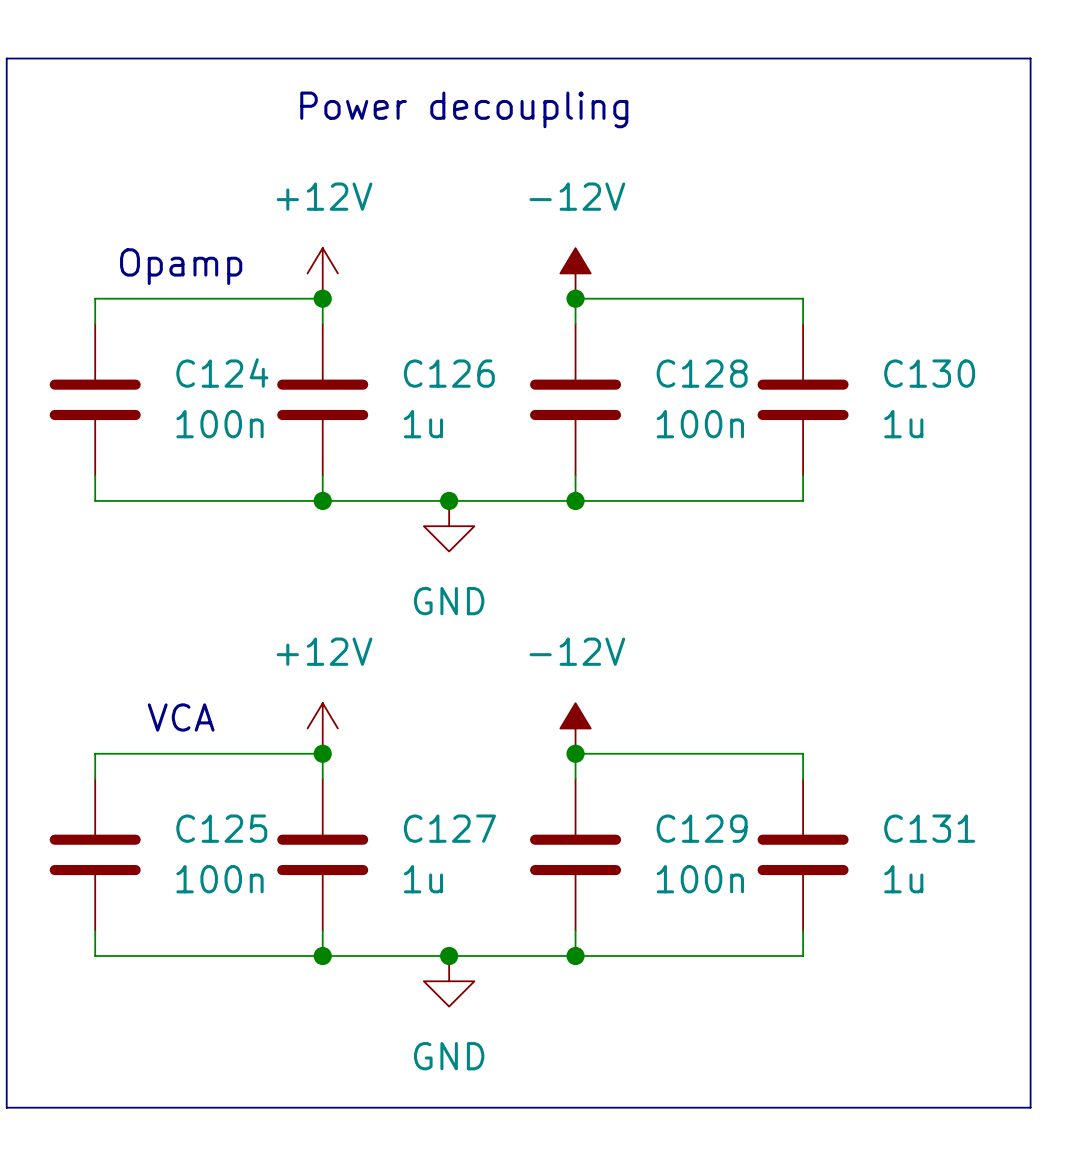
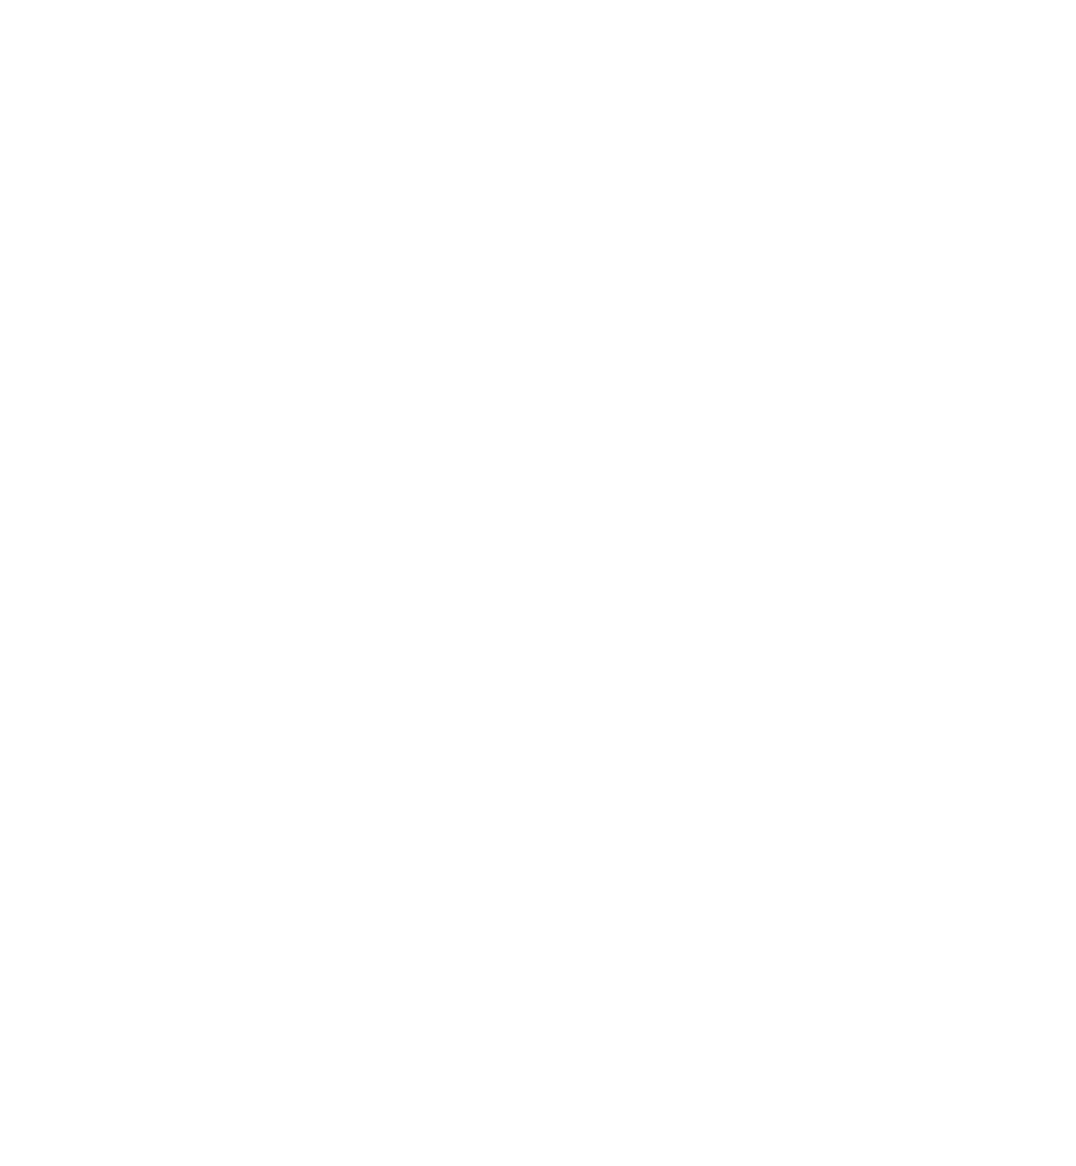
line: (6, 58) (1030, 58) (1030, 1107) (6, 1107) (6, 58) -> none
text: Power decoupling (464, 109) -> none
text: Opamp (181, 266) -> none
power symbol: +12V (322, 273) -> none
power symbol: -12V (575, 273) -> none
junction: (322, 298) -> none
junction: (575, 298) -> none
wire: (95, 323) (95, 298) (322, 298) (322, 323) -> none
wire: (575, 323) (575, 298) (803, 298) (803, 323) -> none
C124: 100n (95, 399) -> none
C126: 1u (322, 399) -> none
C128: 100n (575, 399) -> none
C130: 1u (803, 399) -> none
wire: (95, 475) (95, 500) (803, 500) (803, 475) -> none
wire: (322, 475) (322, 500) -> none
wire: (575, 475) (575, 500) -> none
junction: (322, 500) -> none
junction: (449, 500) -> none
junction: (575, 500) -> none
power symbol: GND (449, 526) -> none
text: VCA (181, 717) -> none
power symbol: +12V (322, 728) -> none
power symbol: -12V (575, 728) -> none
junction: (322, 753) -> none
junction: (575, 753) -> none
wire: (95, 779) (95, 753) (322, 753) (322, 779) -> none
wire: (575, 779) (575, 753) (803, 753) (803, 779) -> none
C125: 100n (95, 854) -> none
C127: 1u (322, 854) -> none
C129: 100n (575, 854) -> none
C131: 1u (803, 854) -> none
wire: (95, 930) (95, 956) (803, 956) (803, 930) -> none
wire: (322, 930) (322, 956) -> none
wire: (575, 930) (575, 956) -> none
junction: (322, 956) -> none
junction: (449, 956) -> none
junction: (575, 956) -> none
power symbol: GND (449, 981) -> none

